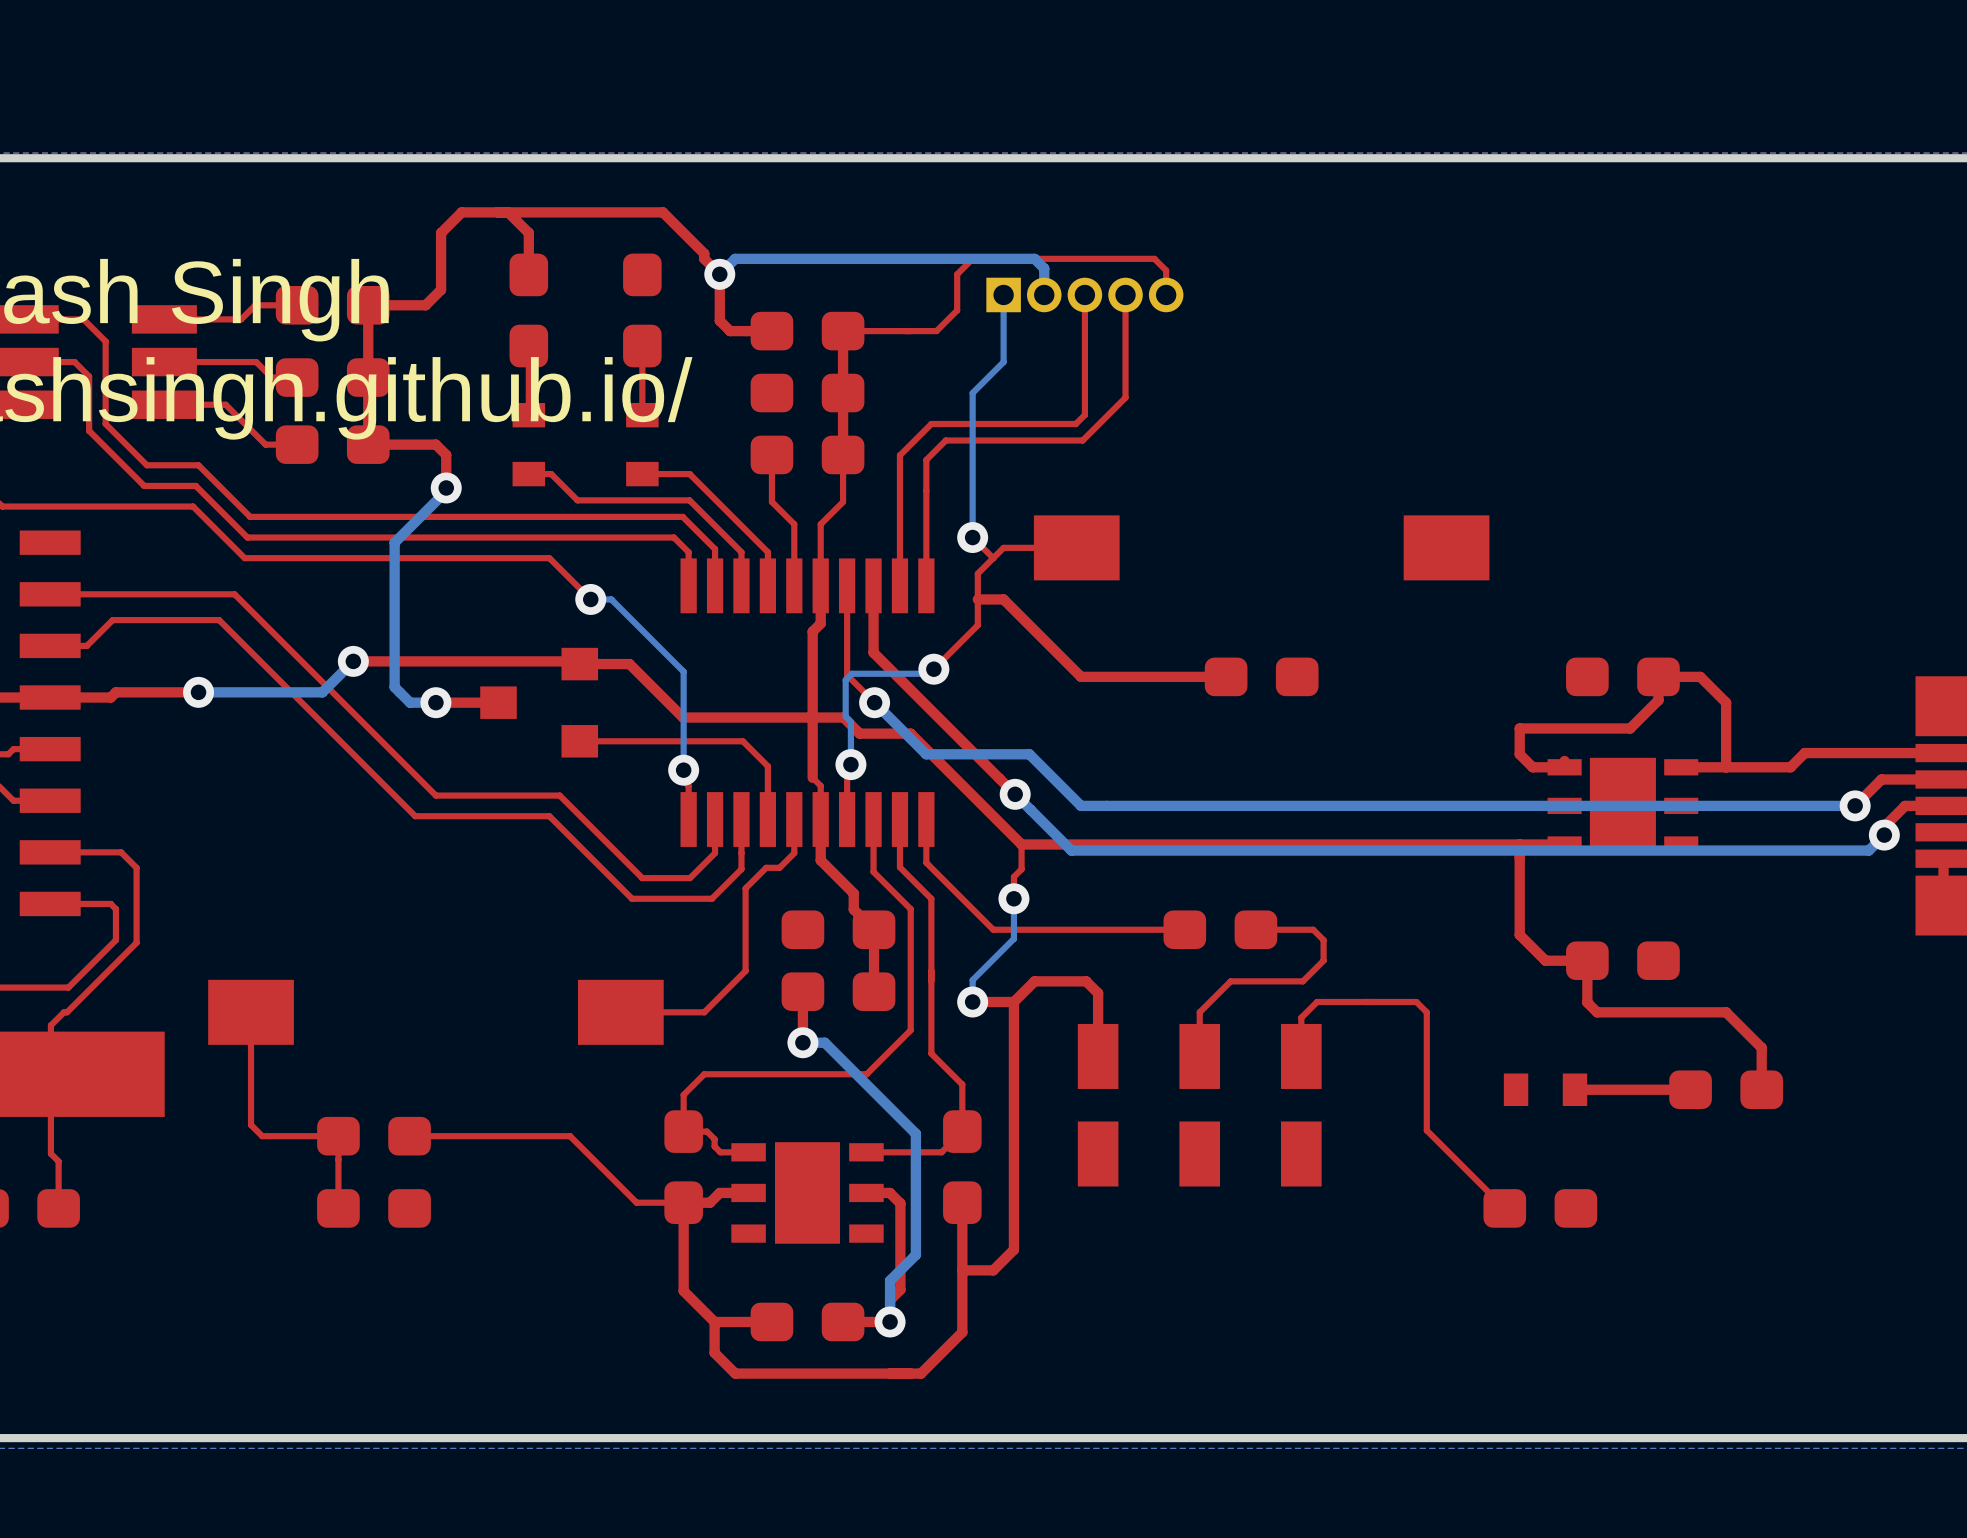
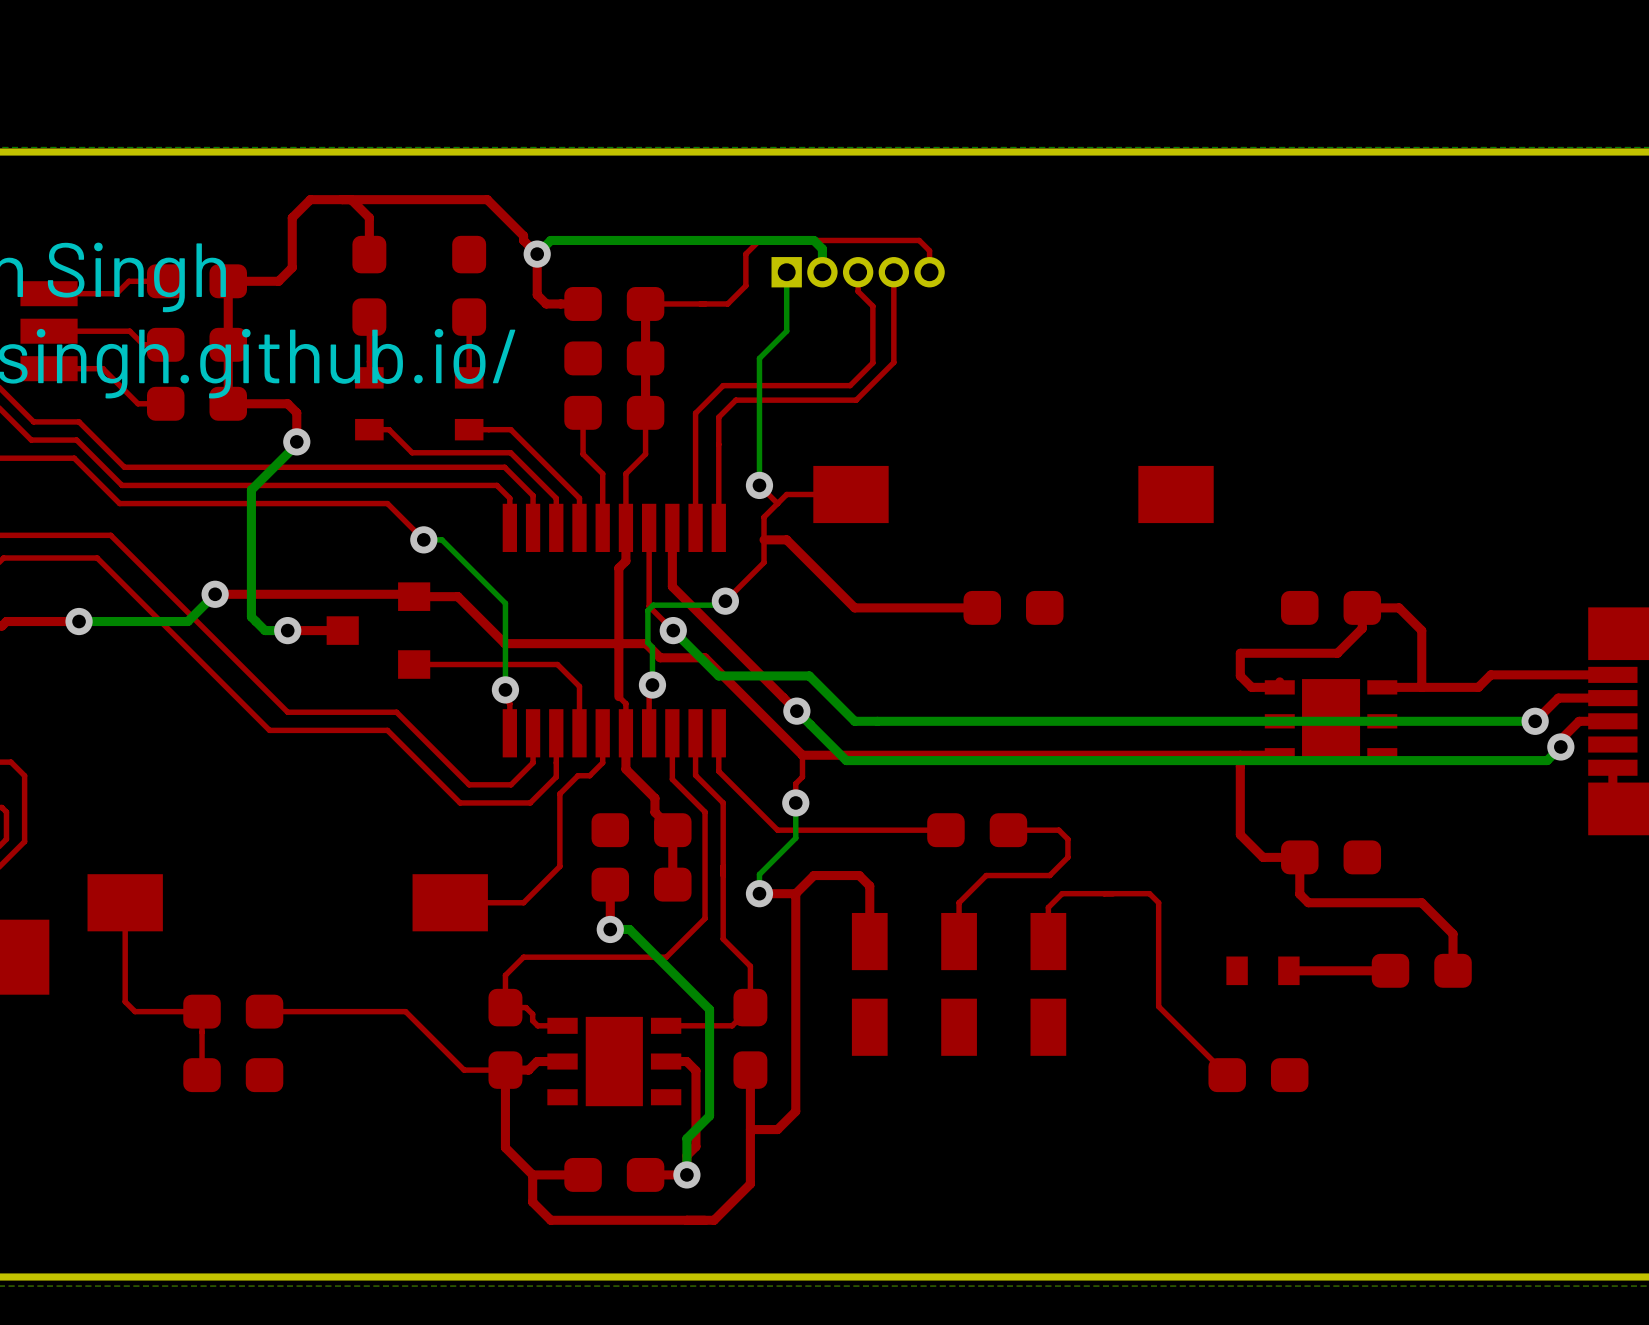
top track: (1084, 316) (1084, 414) -> (858, 291) (872, 306) (872, 362) (858, 377)

